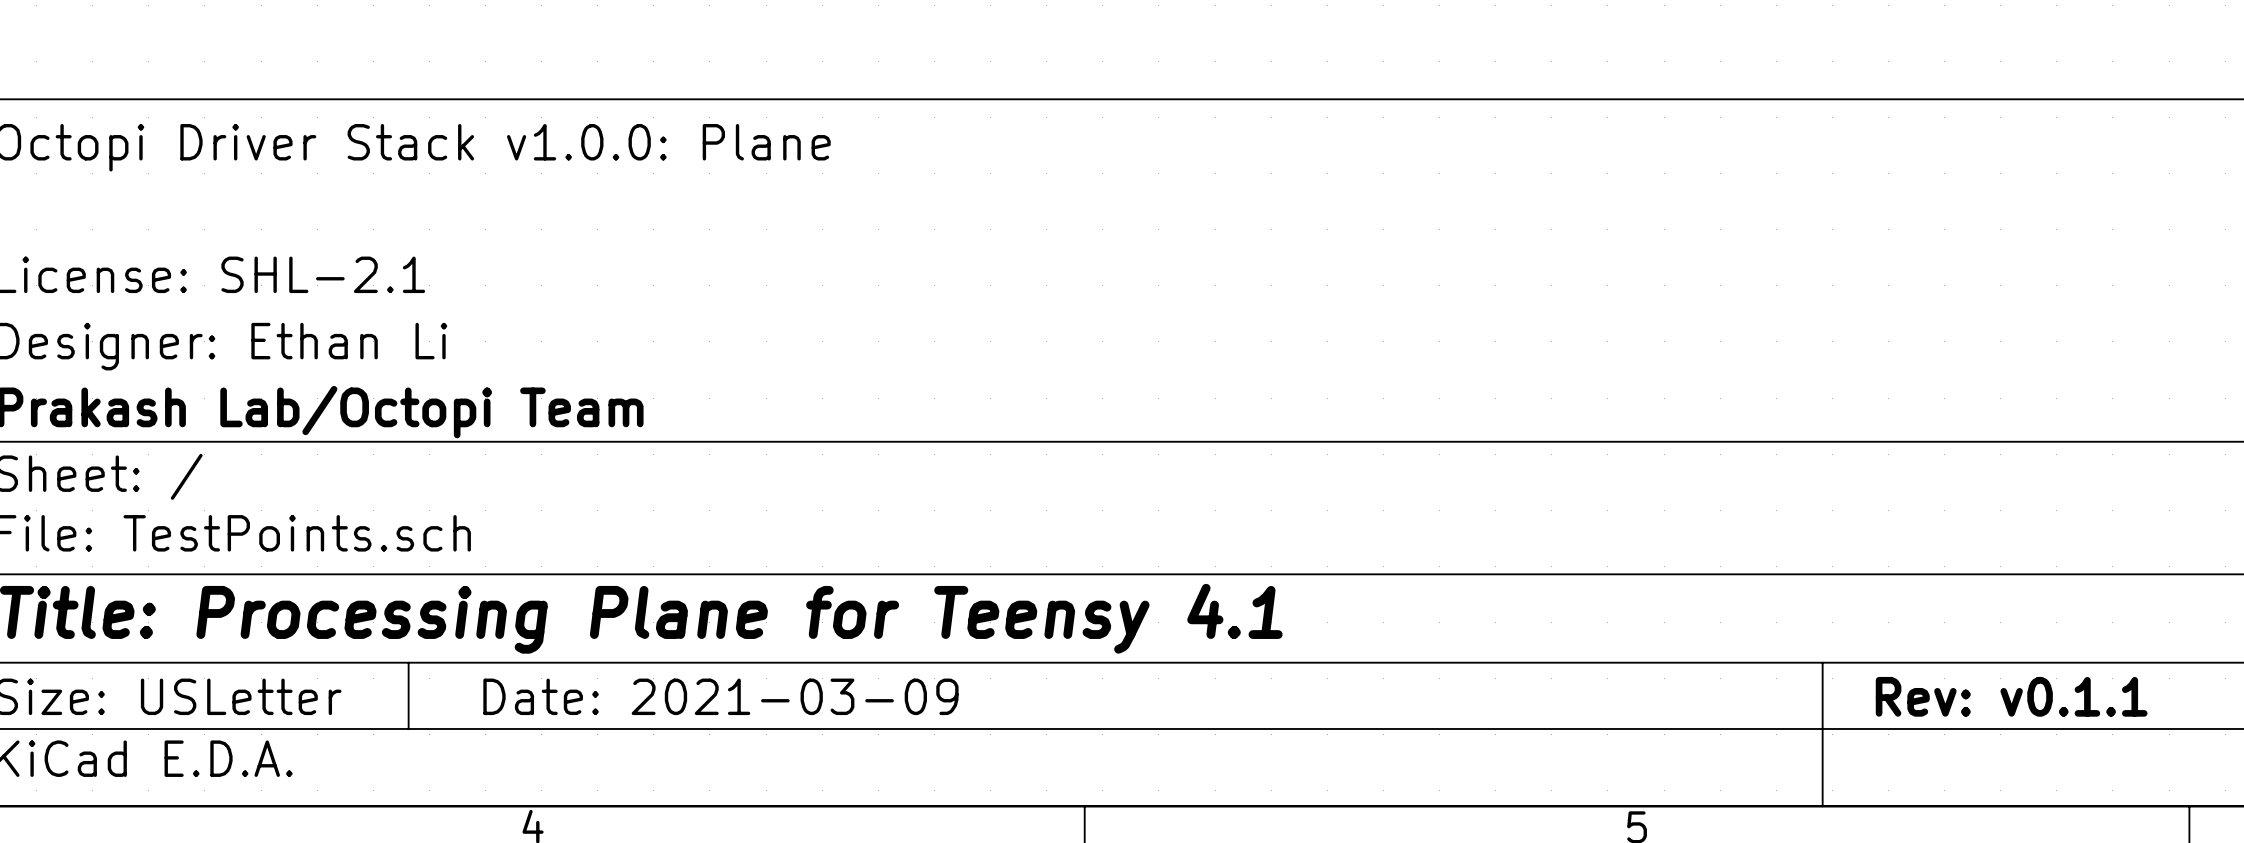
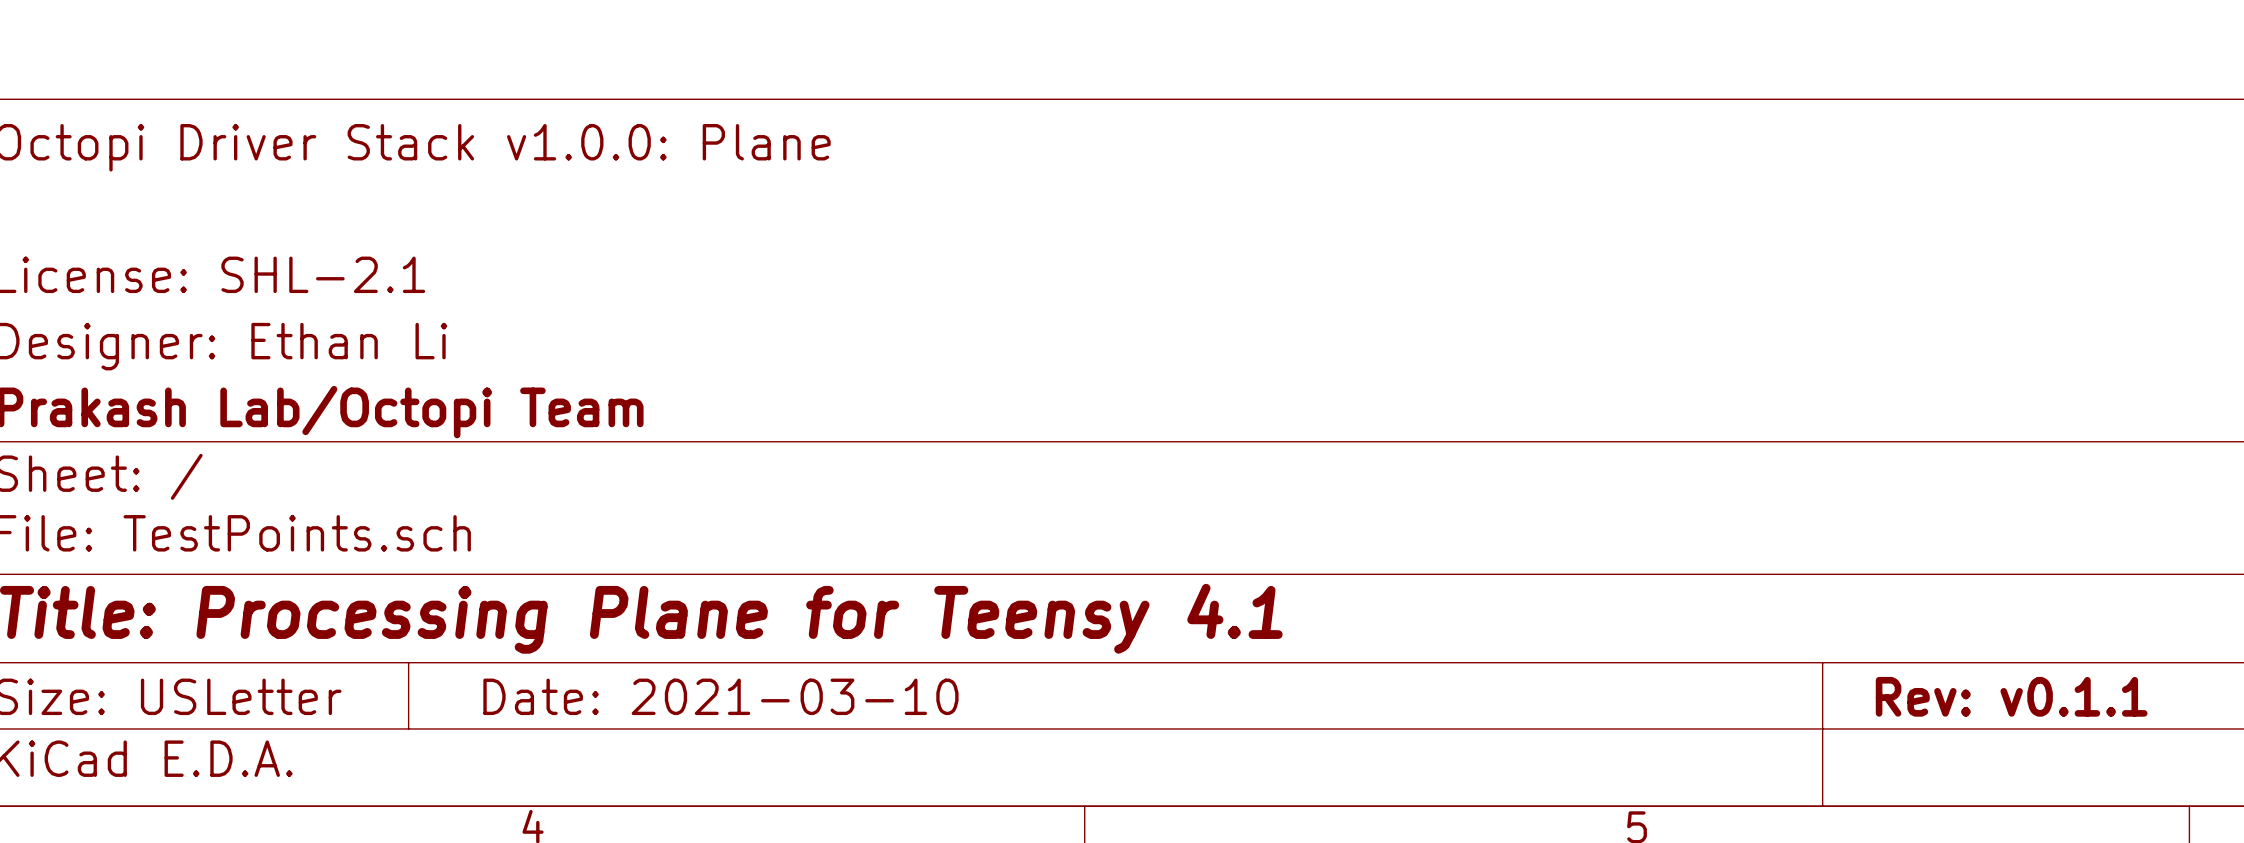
title block: Date: 2021-03-09 (720, 696) -> Date: 2021-03-10 (720, 696)

